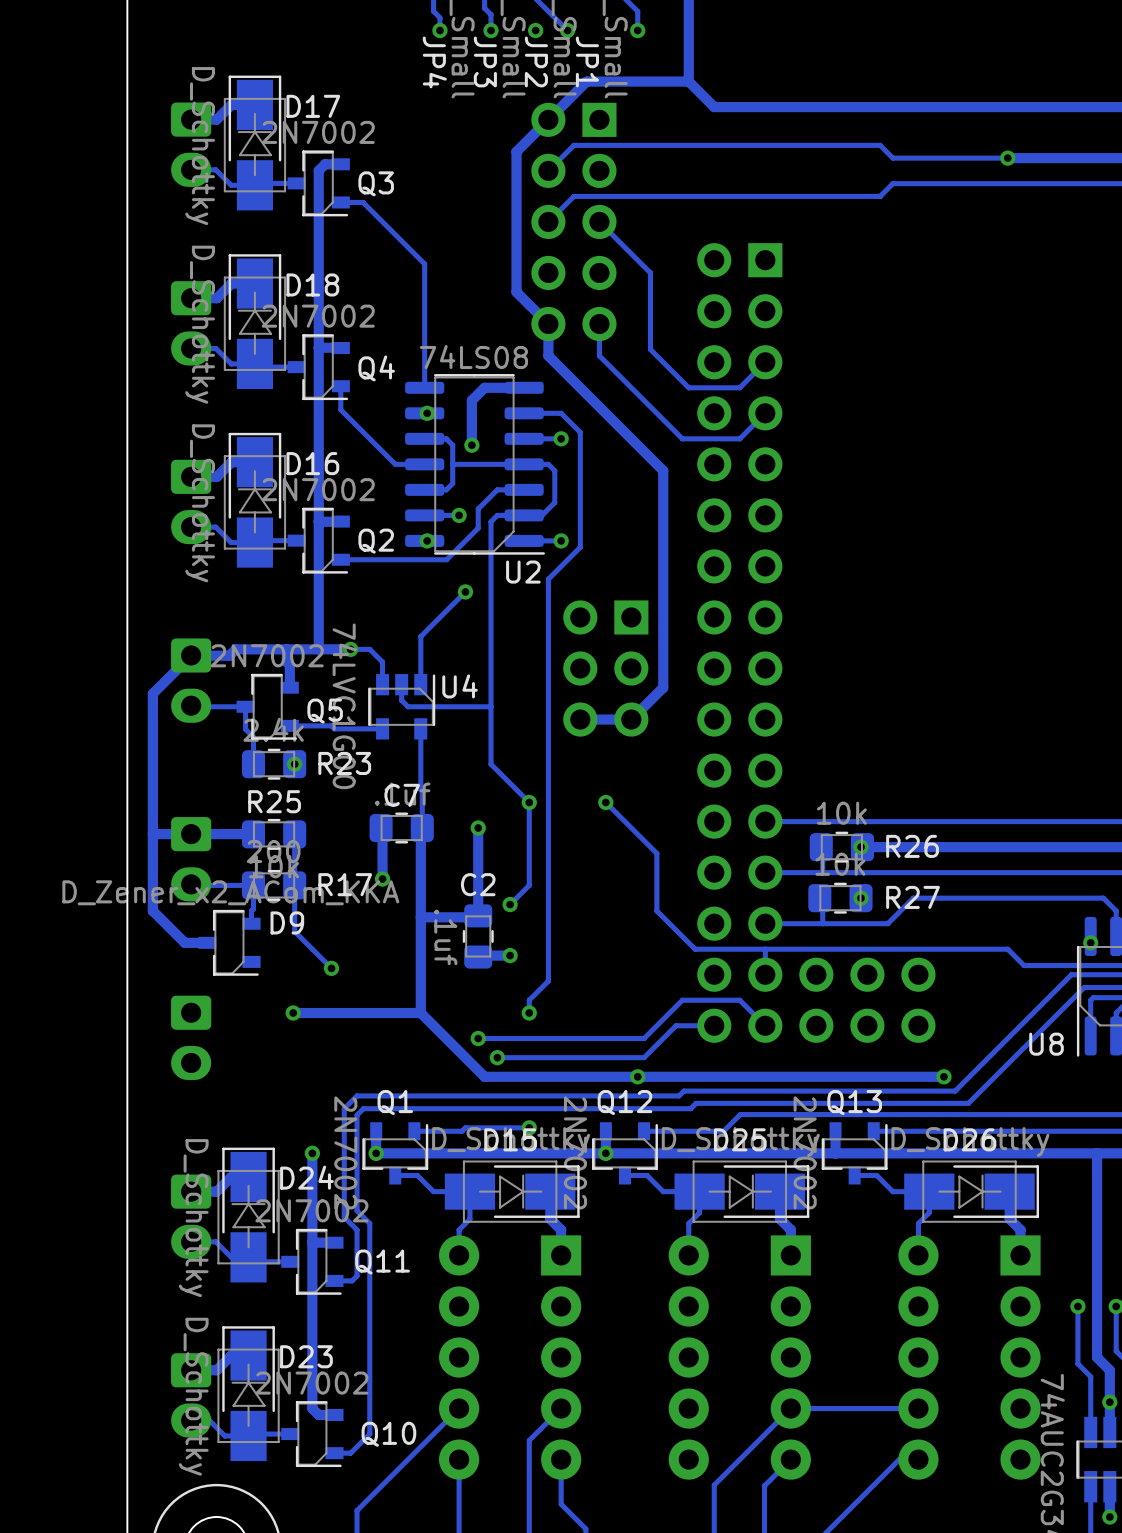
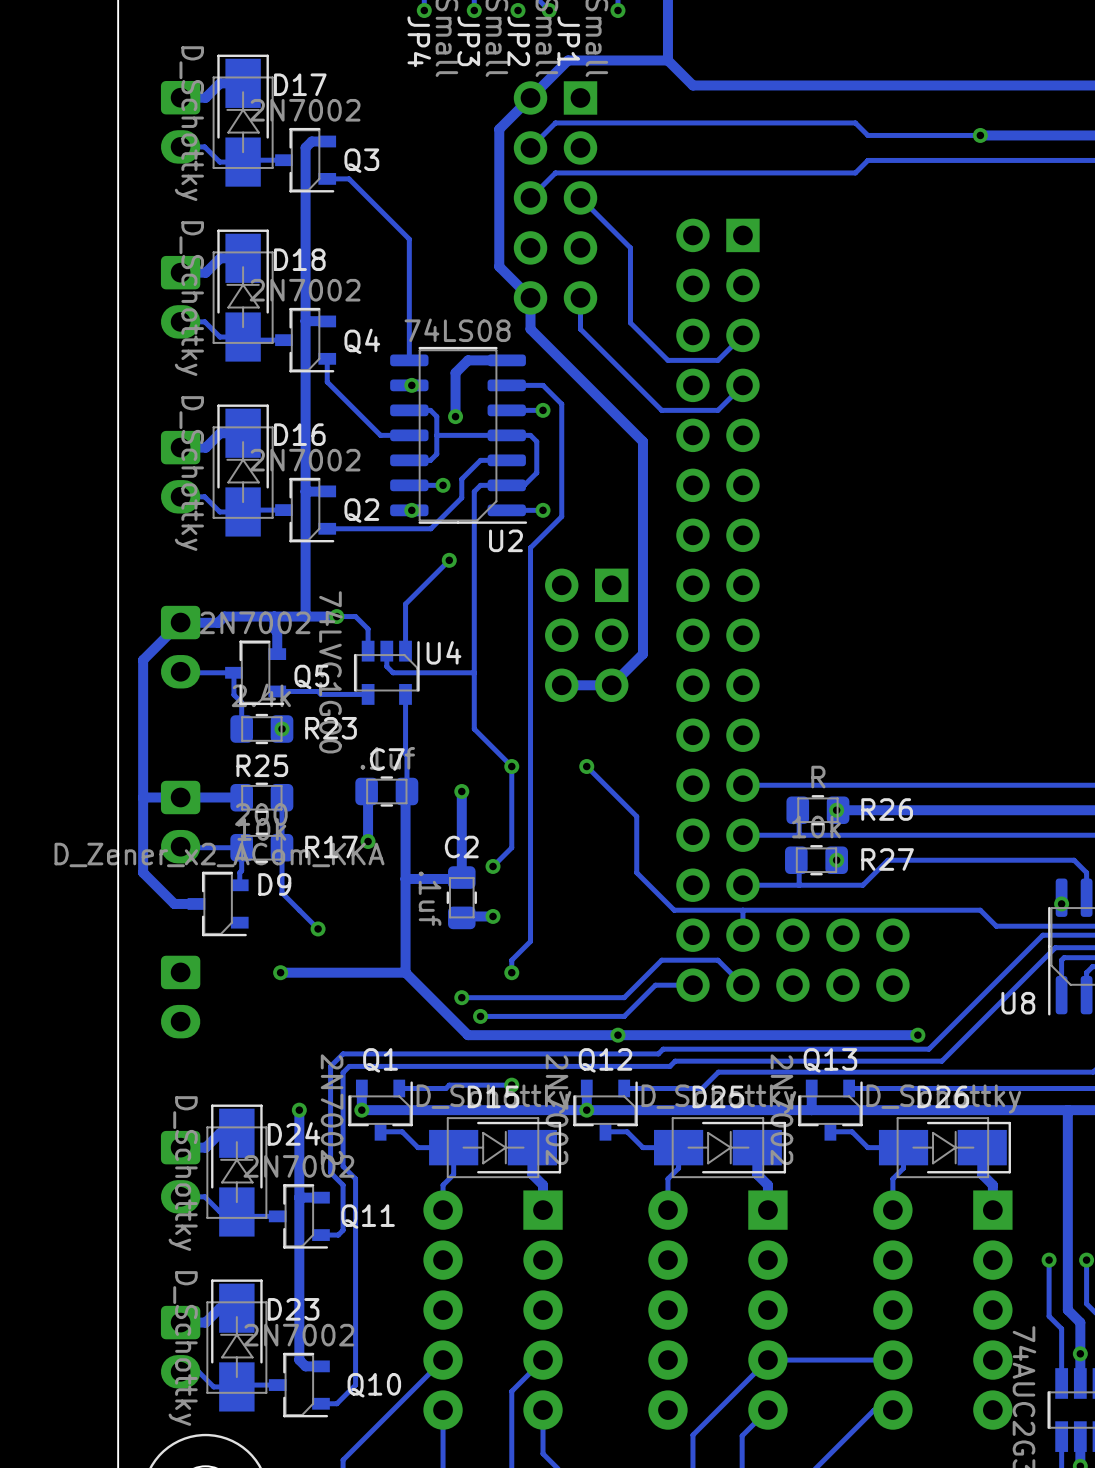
R26 value: 10k (841, 813) -> R (818, 777)

